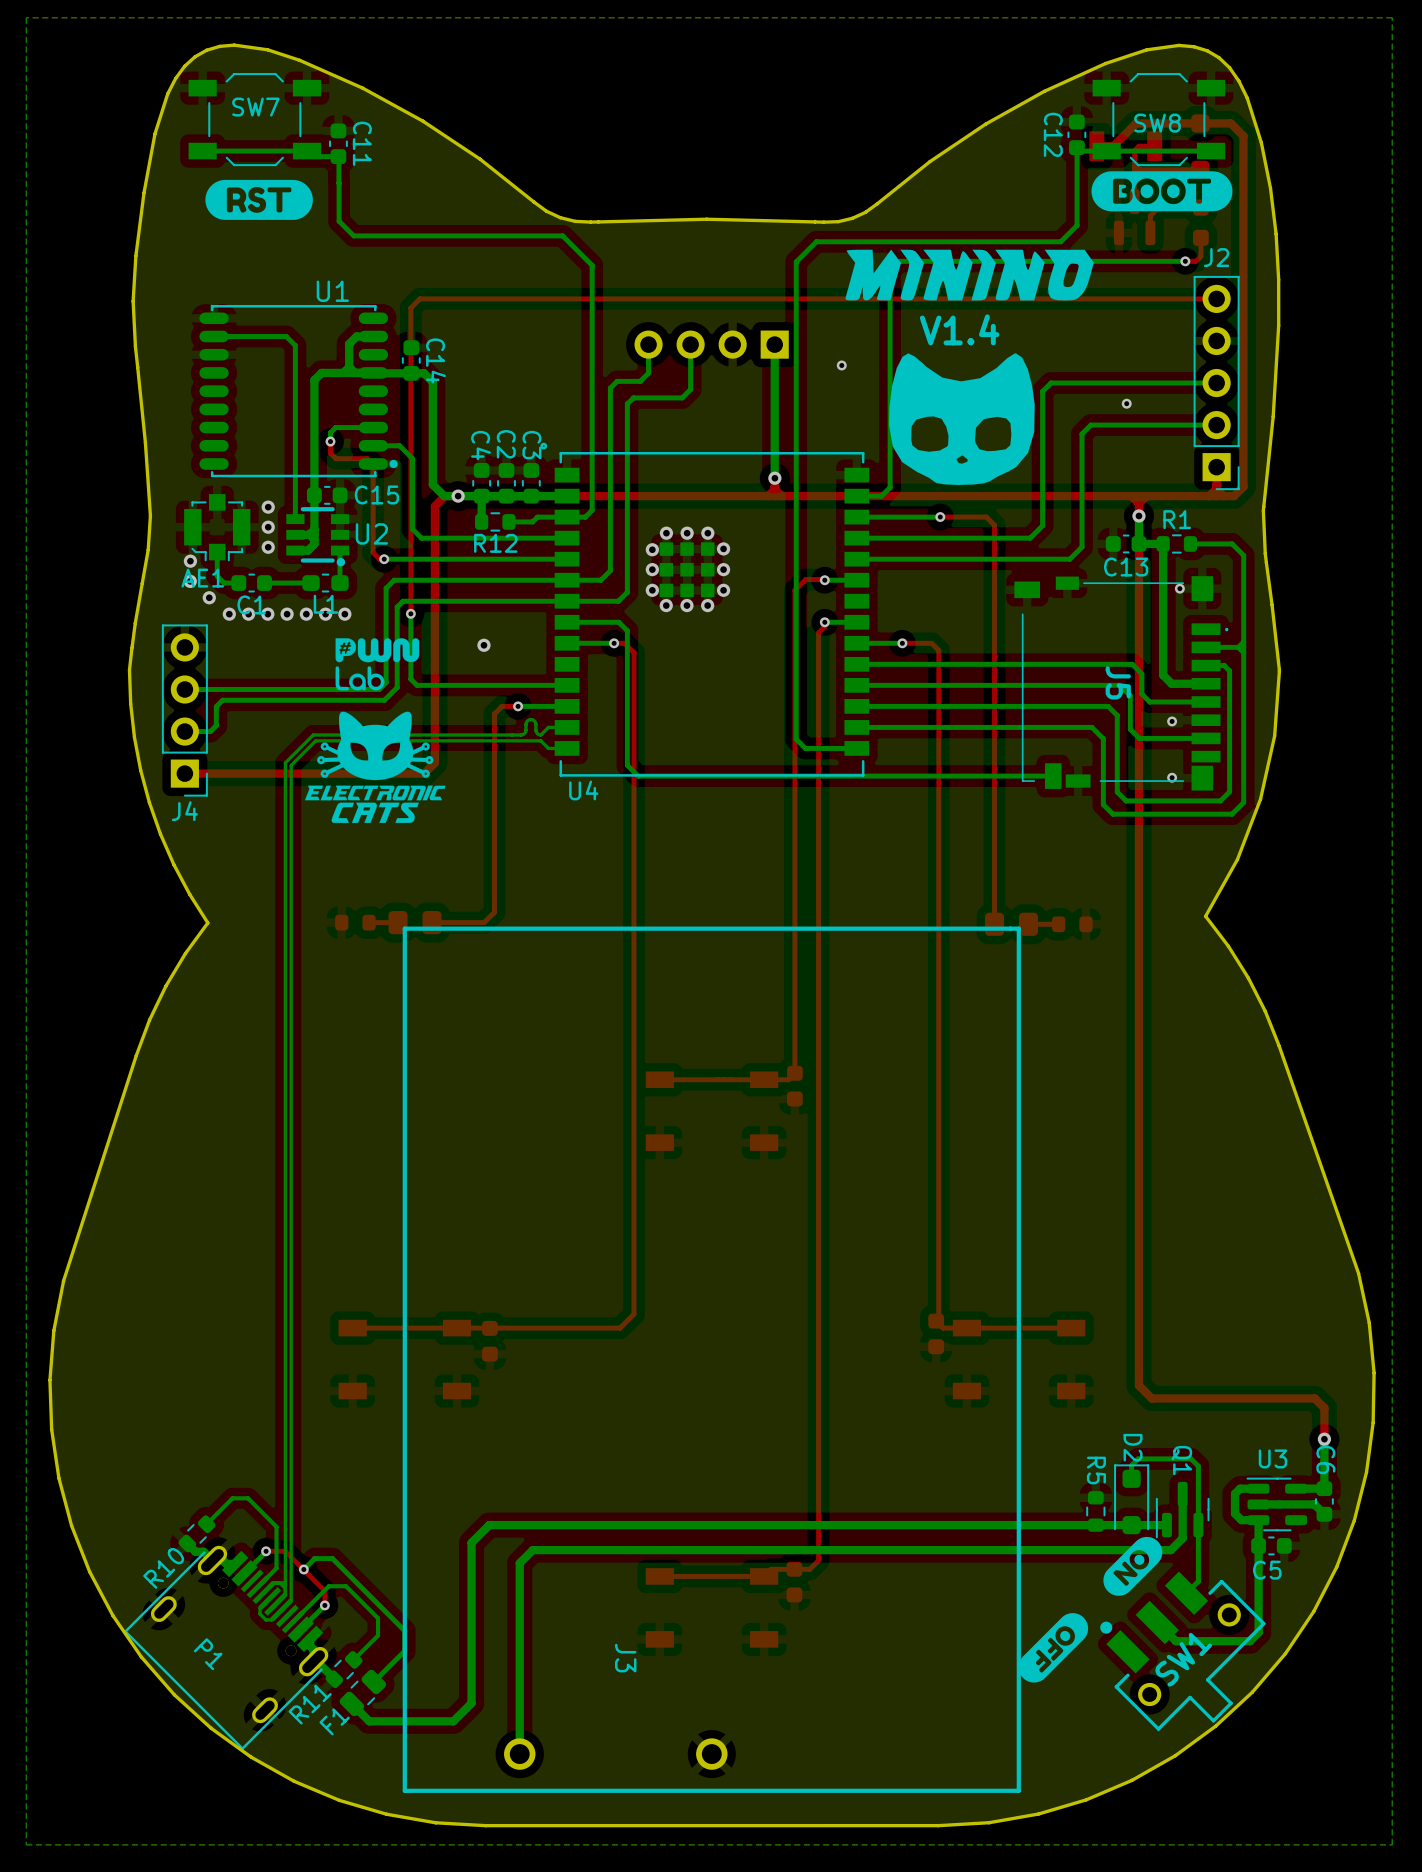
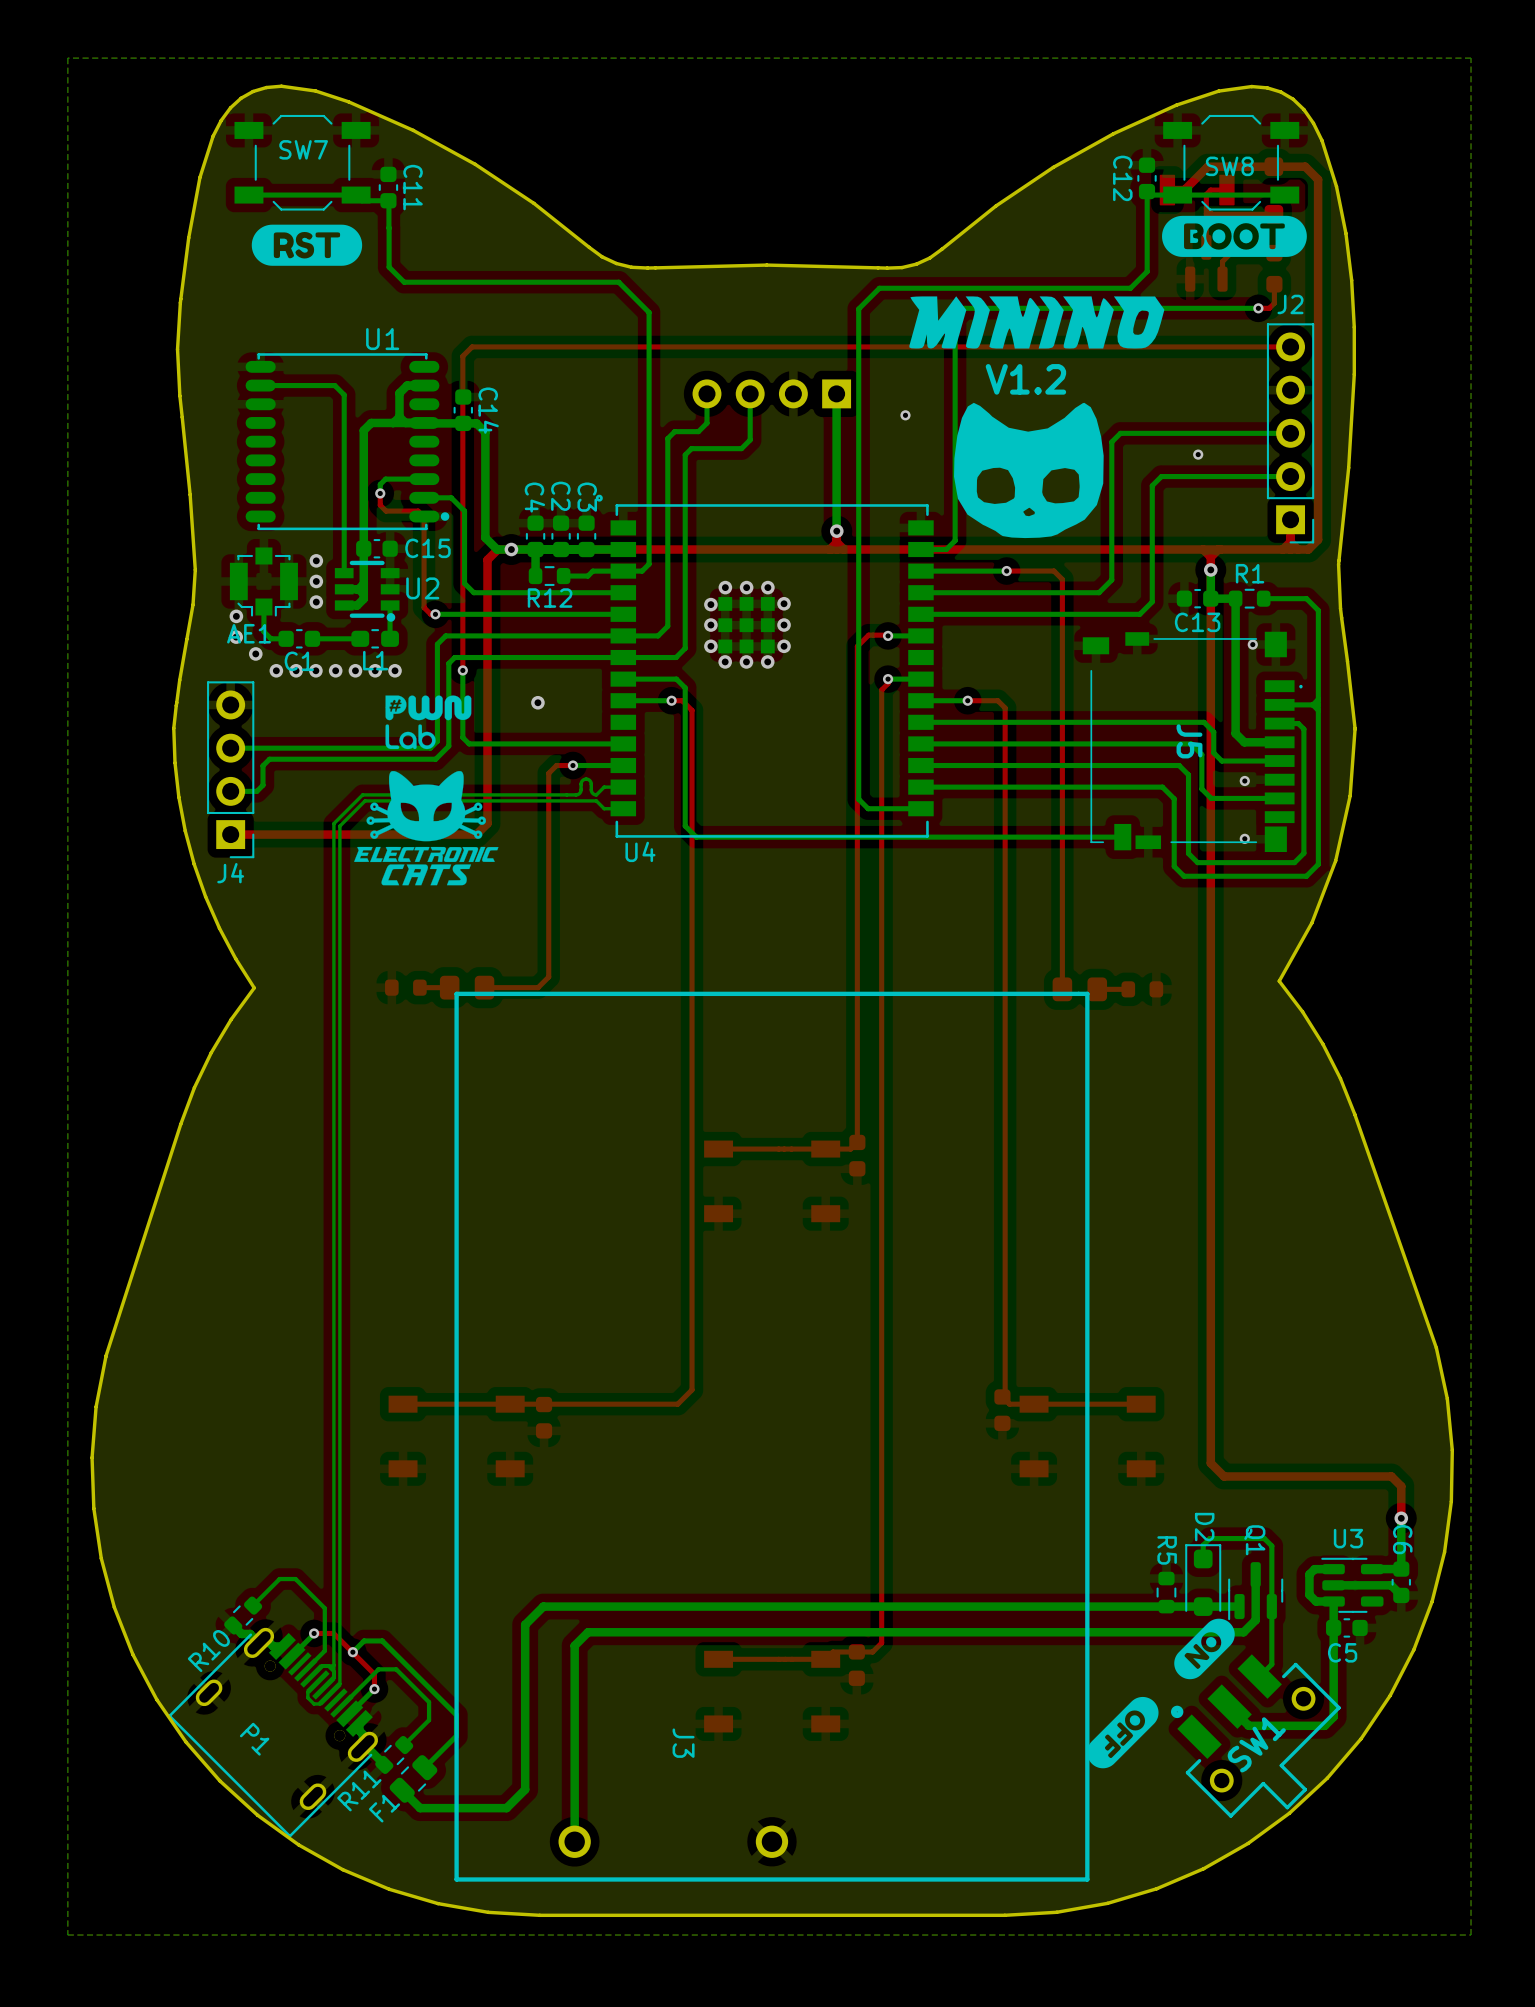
text: V1.4 (959, 329) -> V1.2 (1025, 379)

